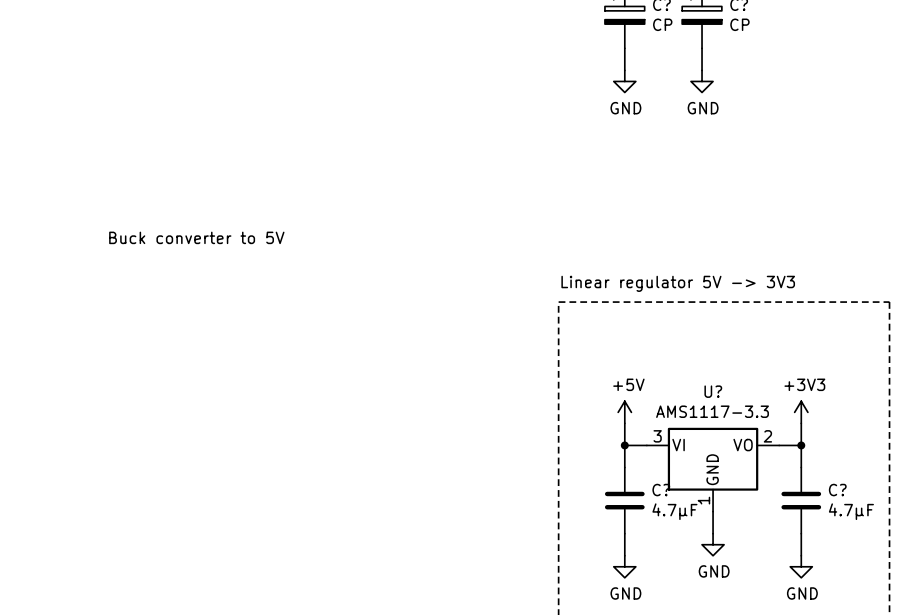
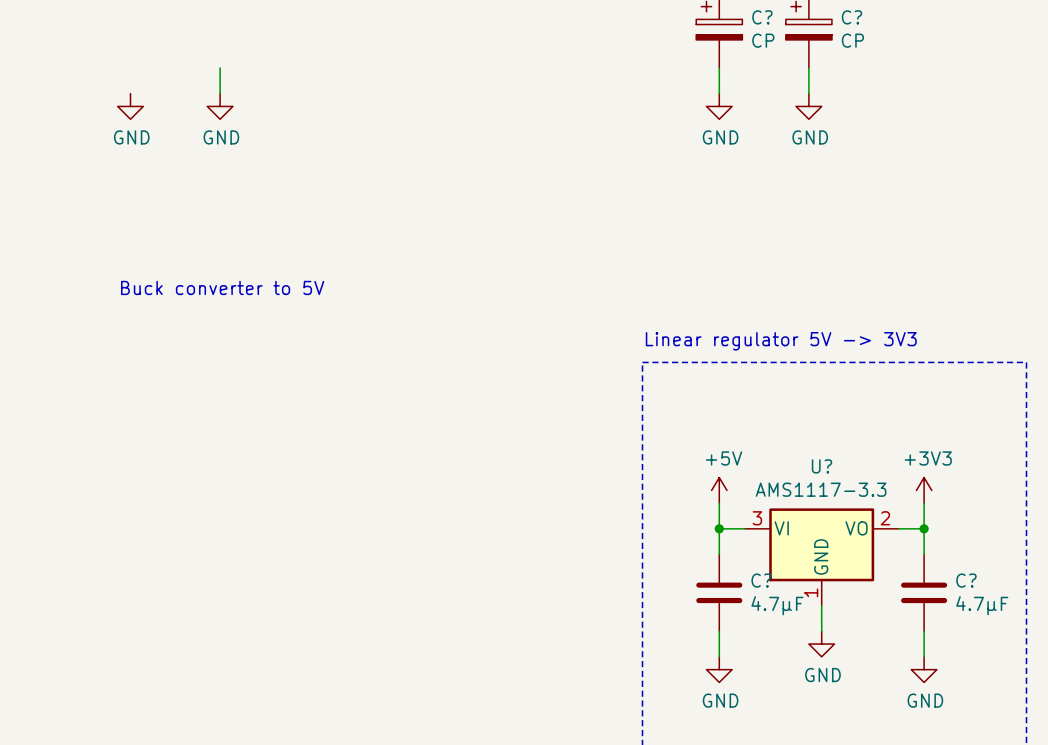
wire: none -> (220, 68) (220, 93)
power symbol: none -> GND (130, 106)
power symbol: none -> GND (220, 106)

